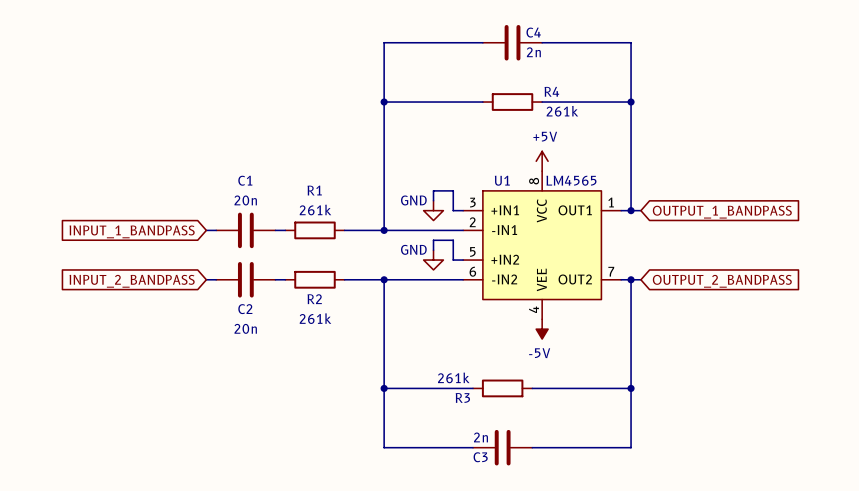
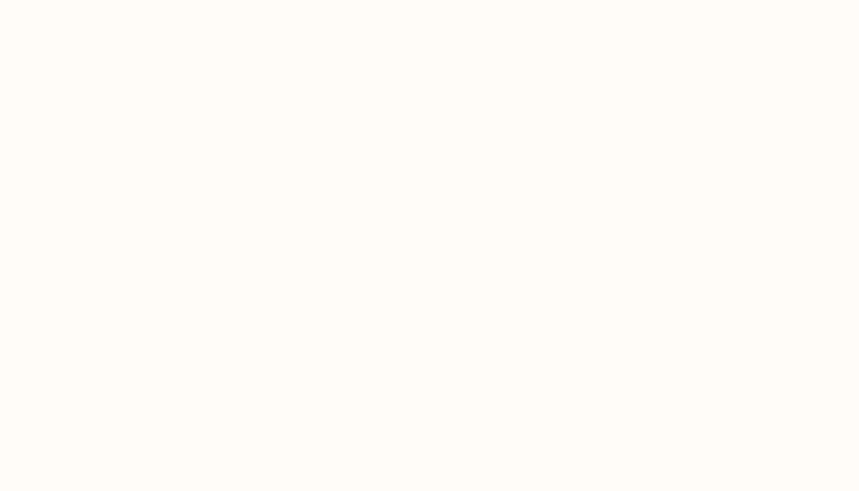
wire: (482, 42) (384, 42) (384, 230) -> none
C4: 2n (512, 42) -> none
wire: (542, 42) (631, 42) (631, 210) -> none
wire: (384, 102) (482, 102) -> none
junction: (384, 102) -> none
R4: 261k (512, 102) -> none
wire: (542, 102) (631, 102) -> none
junction: (631, 102) -> none
power symbol: +5V (542, 161) -> none
wire: (433, 200) (433, 190) (453, 190) (453, 210) (463, 210) -> none
power symbol: GND (433, 210) -> none
wire: (621, 210) (640, 210) -> none
junction: (631, 210) -> none
global label: OUTPUT_1_BANDPASS (722, 212) -> none
wire: (206, 230) (216, 230) -> none
C1: 20n (245, 230) -> none
wire: (275, 230) (285, 230) -> none
R1: 261k (315, 230) -> none
wire: (344, 230) (463, 230) -> none
junction: (384, 230) -> none
global label: INPUT_1_BANDPASS (132, 231) -> none
U1: LM4565 (542, 245) -> none
wire: (433, 250) (433, 240) (453, 240) (453, 260) (463, 260) -> none
power symbol: GND (433, 260) -> none
wire: (206, 279) (216, 279) -> none
C2: 20n (245, 279) -> none
wire: (275, 279) (285, 279) -> none
R2: 261k (315, 279) -> none
wire: (344, 279) (463, 279) -> none
wire: (384, 279) (384, 447) (473, 447) -> none
junction: (384, 279) -> none
wire: (621, 279) (640, 279) -> none
wire: (631, 279) (631, 447) (532, 447) -> none
junction: (631, 279) -> none
global label: INPUT_2_BANDPASS (132, 281) -> none
global label: OUTPUT_2_BANDPASS (722, 281) -> none
power symbol: -5V (542, 329) -> none
wire: (384, 388) (473, 388) -> none
junction: (384, 388) -> none
R3: 261k (502, 388) -> none
wire: (532, 388) (631, 388) -> none
junction: (631, 388) -> none
C3: 2n (502, 447) -> none

